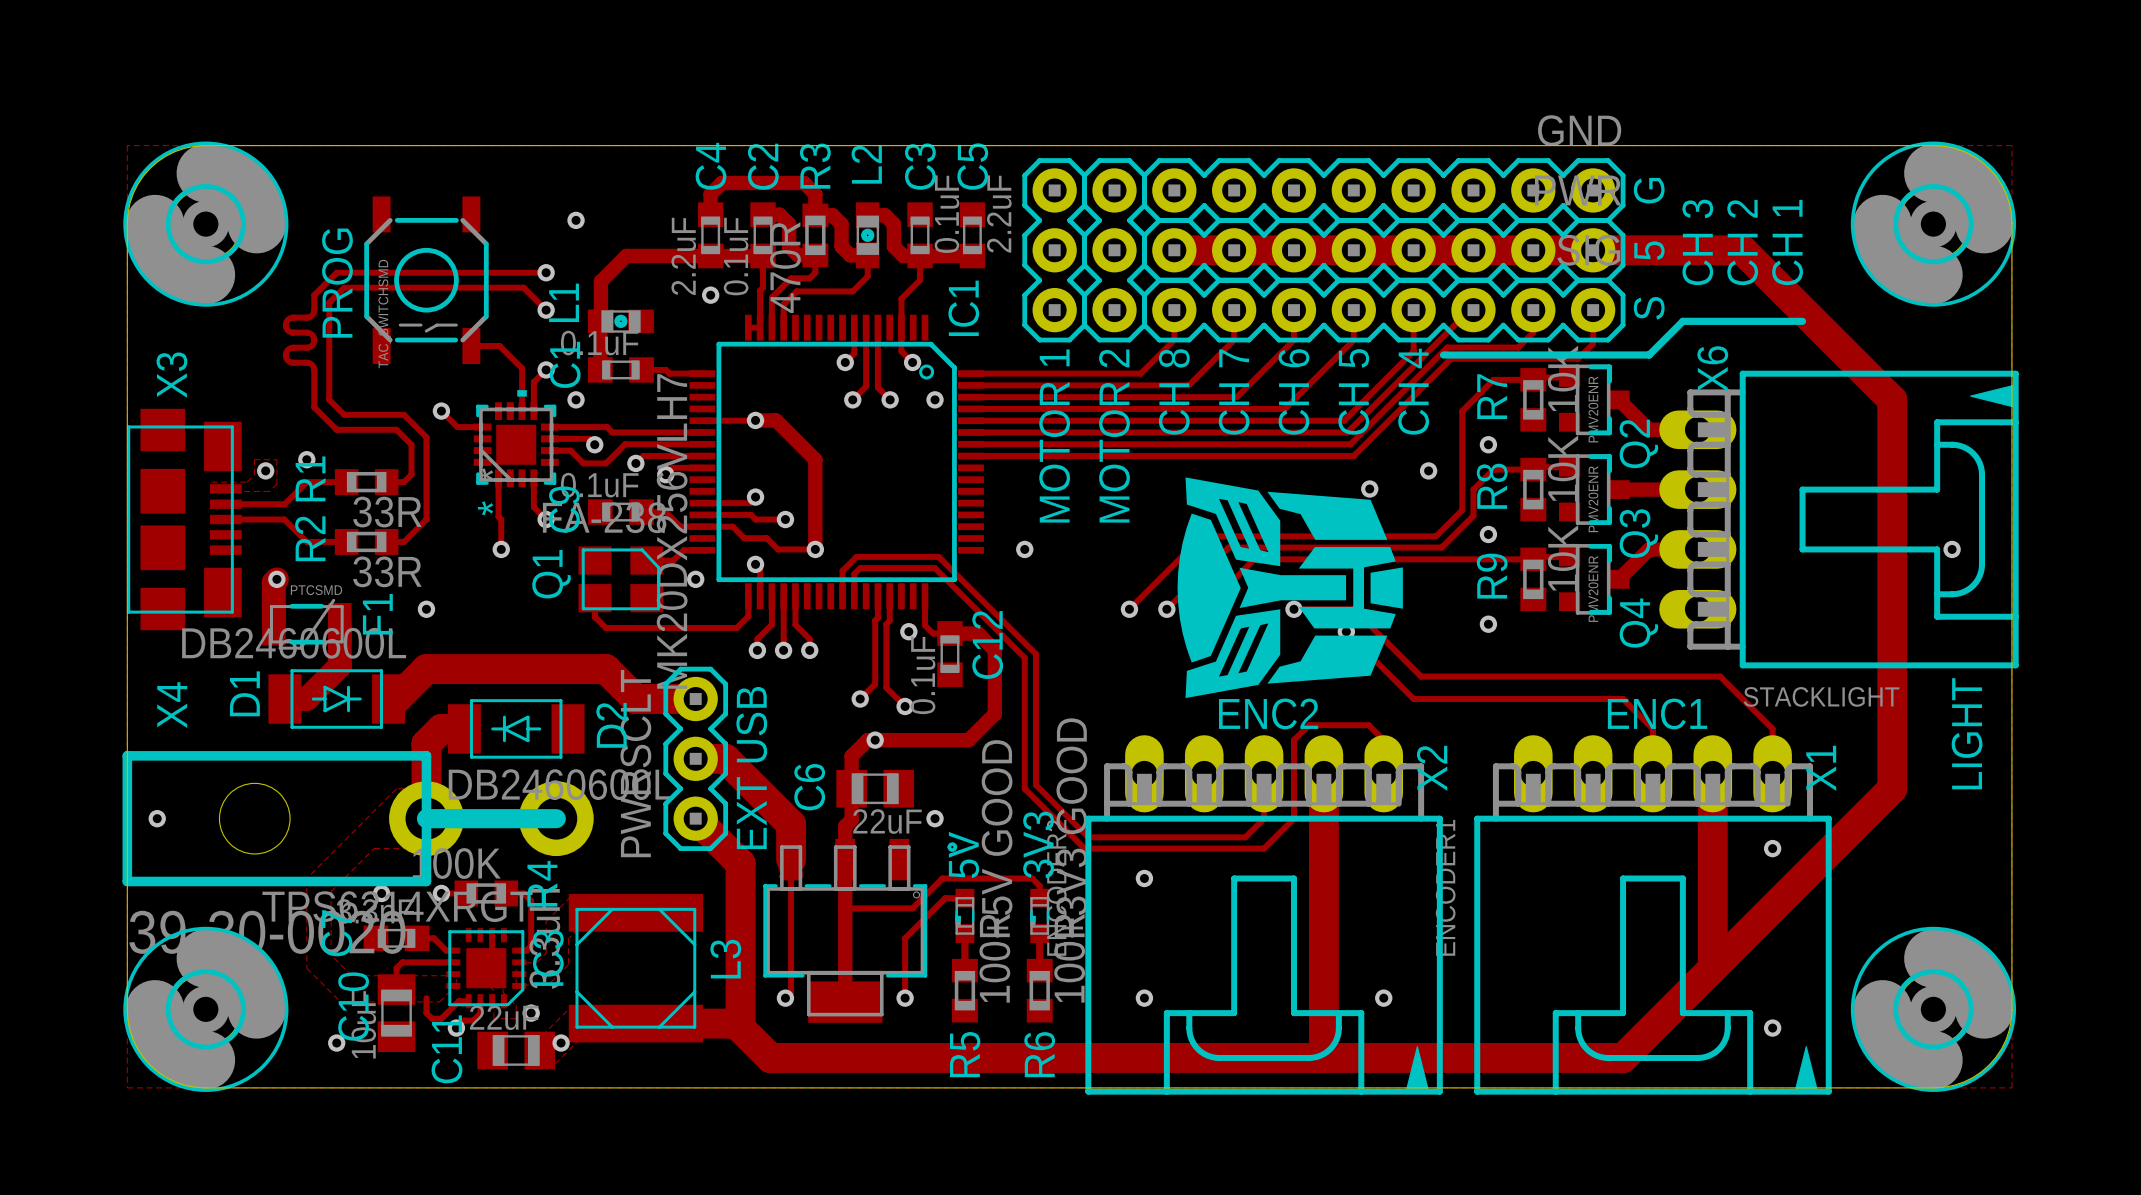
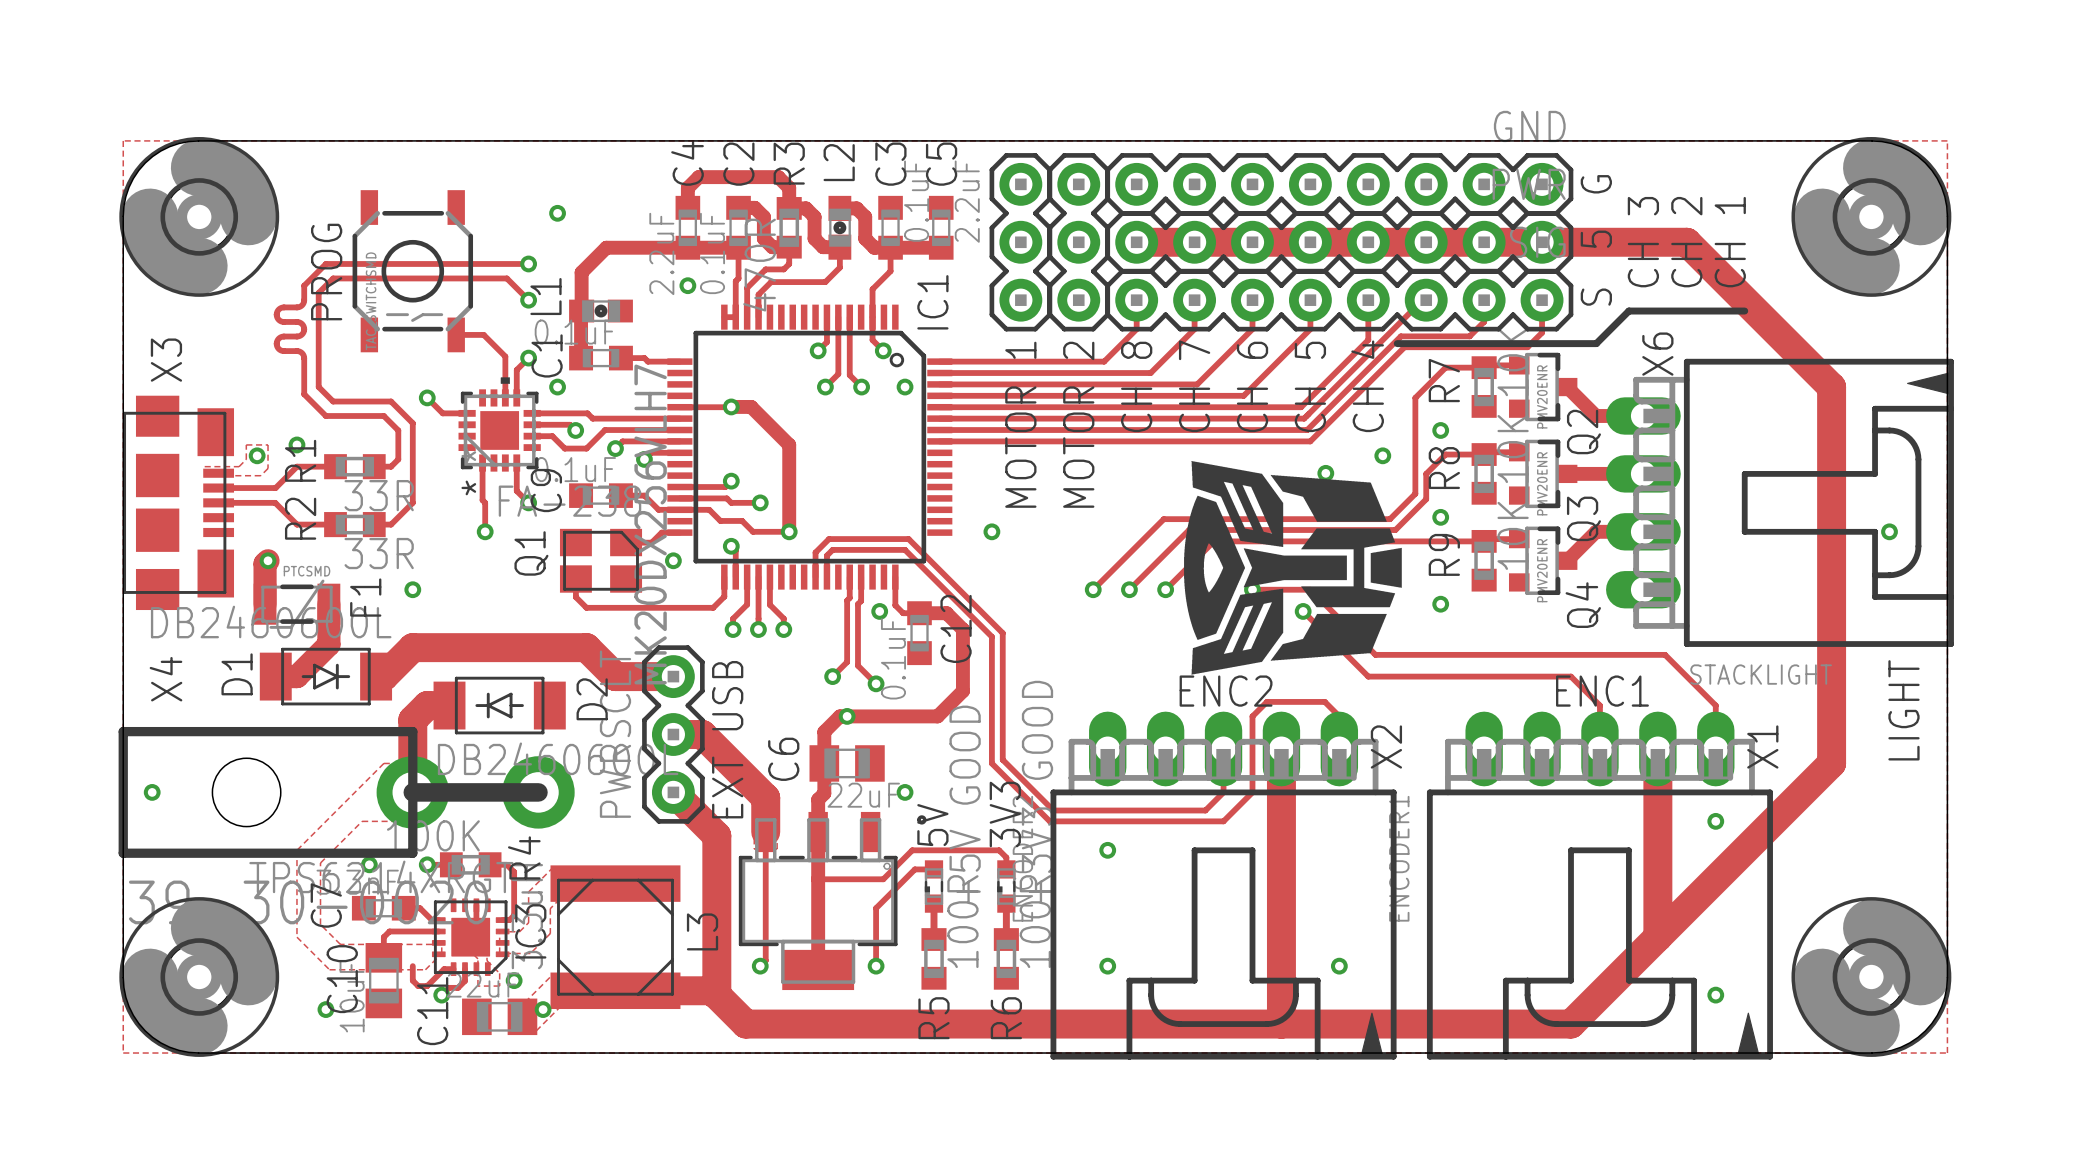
drawing: none -> [1184, 461, 1402, 675]
drawing: [1177, 477, 1403, 699] -> none

